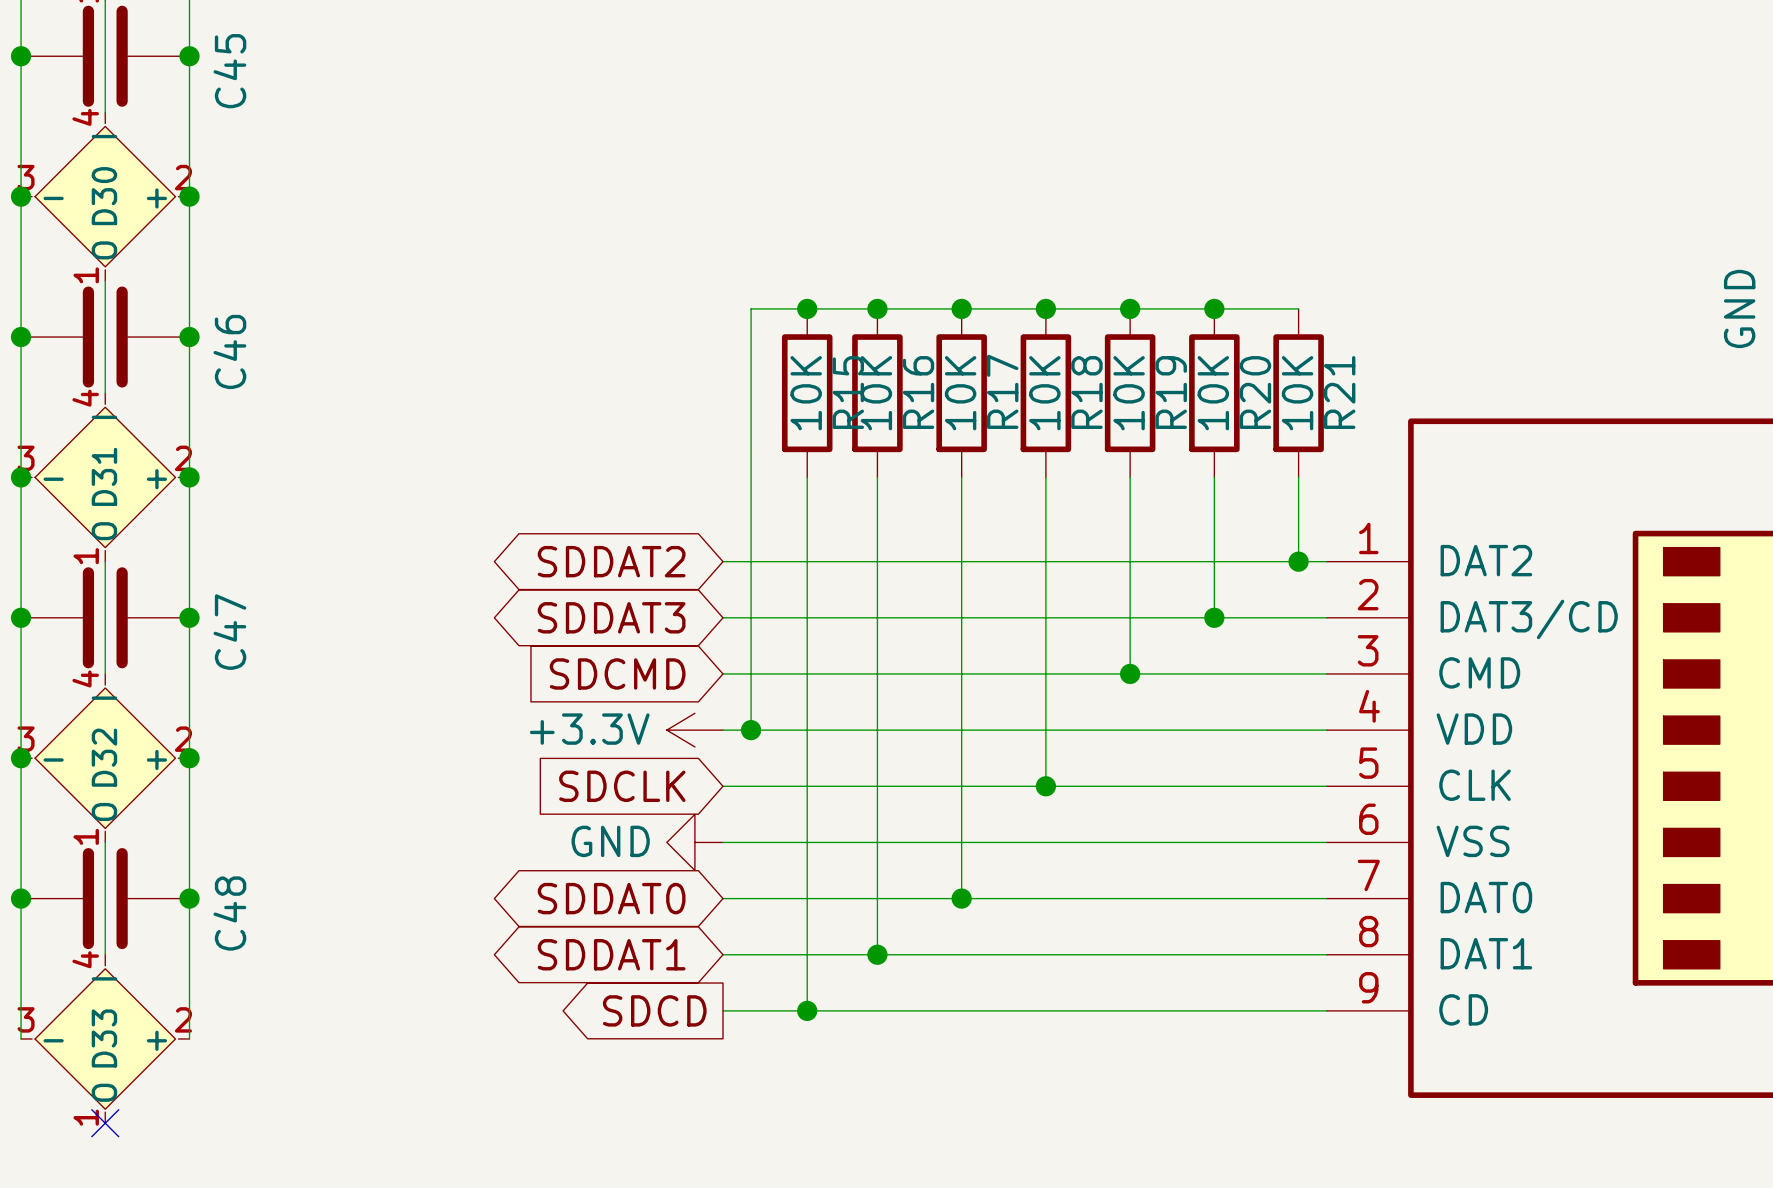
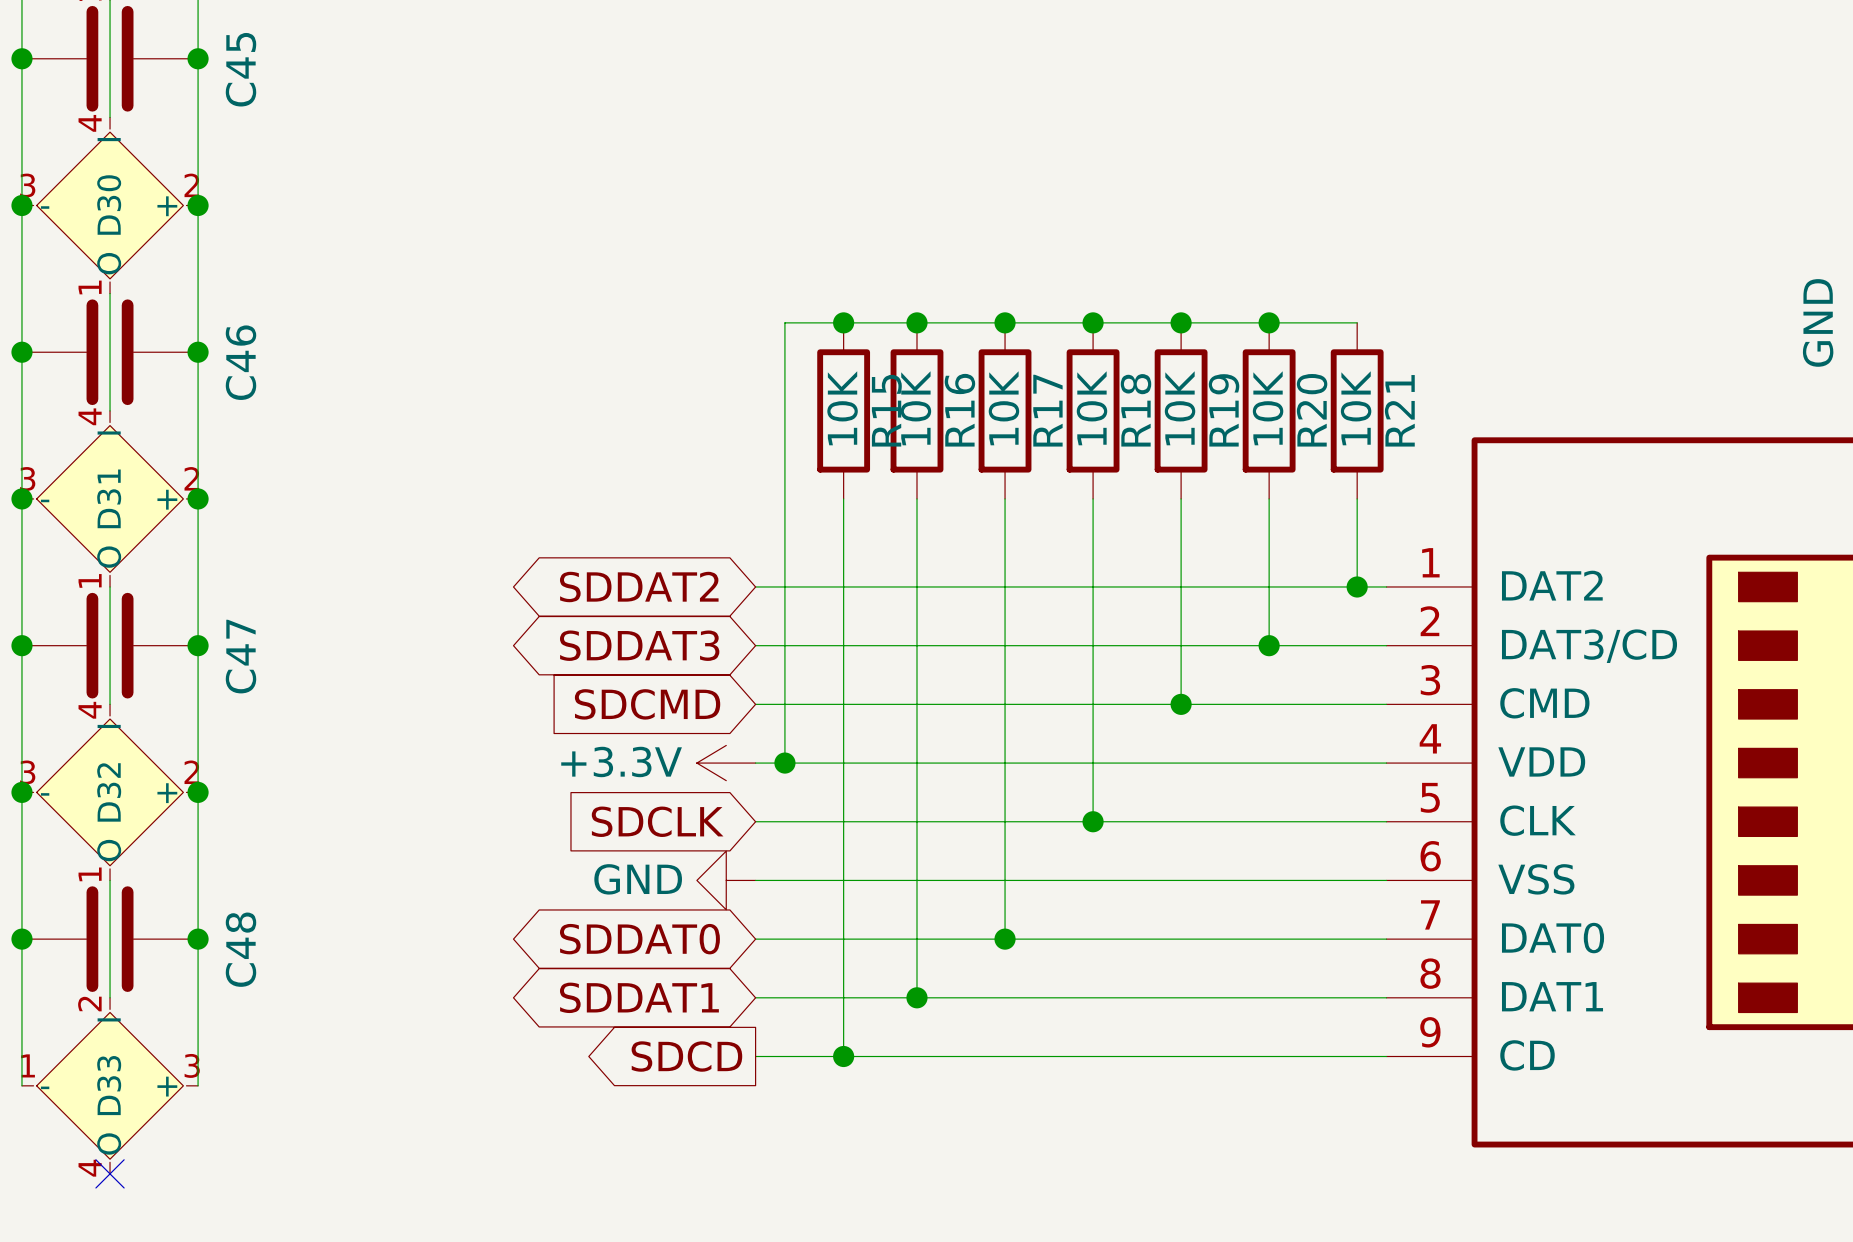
D33 pin number: 4 (85, 959) -> 2 (89, 1004)
D33 pin number: 3 (26, 1019) -> 1 (28, 1065)
D33 pin number: 2 (183, 1019) -> 3 (192, 1065)
D33 pin number: 1 (86, 1117) -> 4 (90, 1168)

